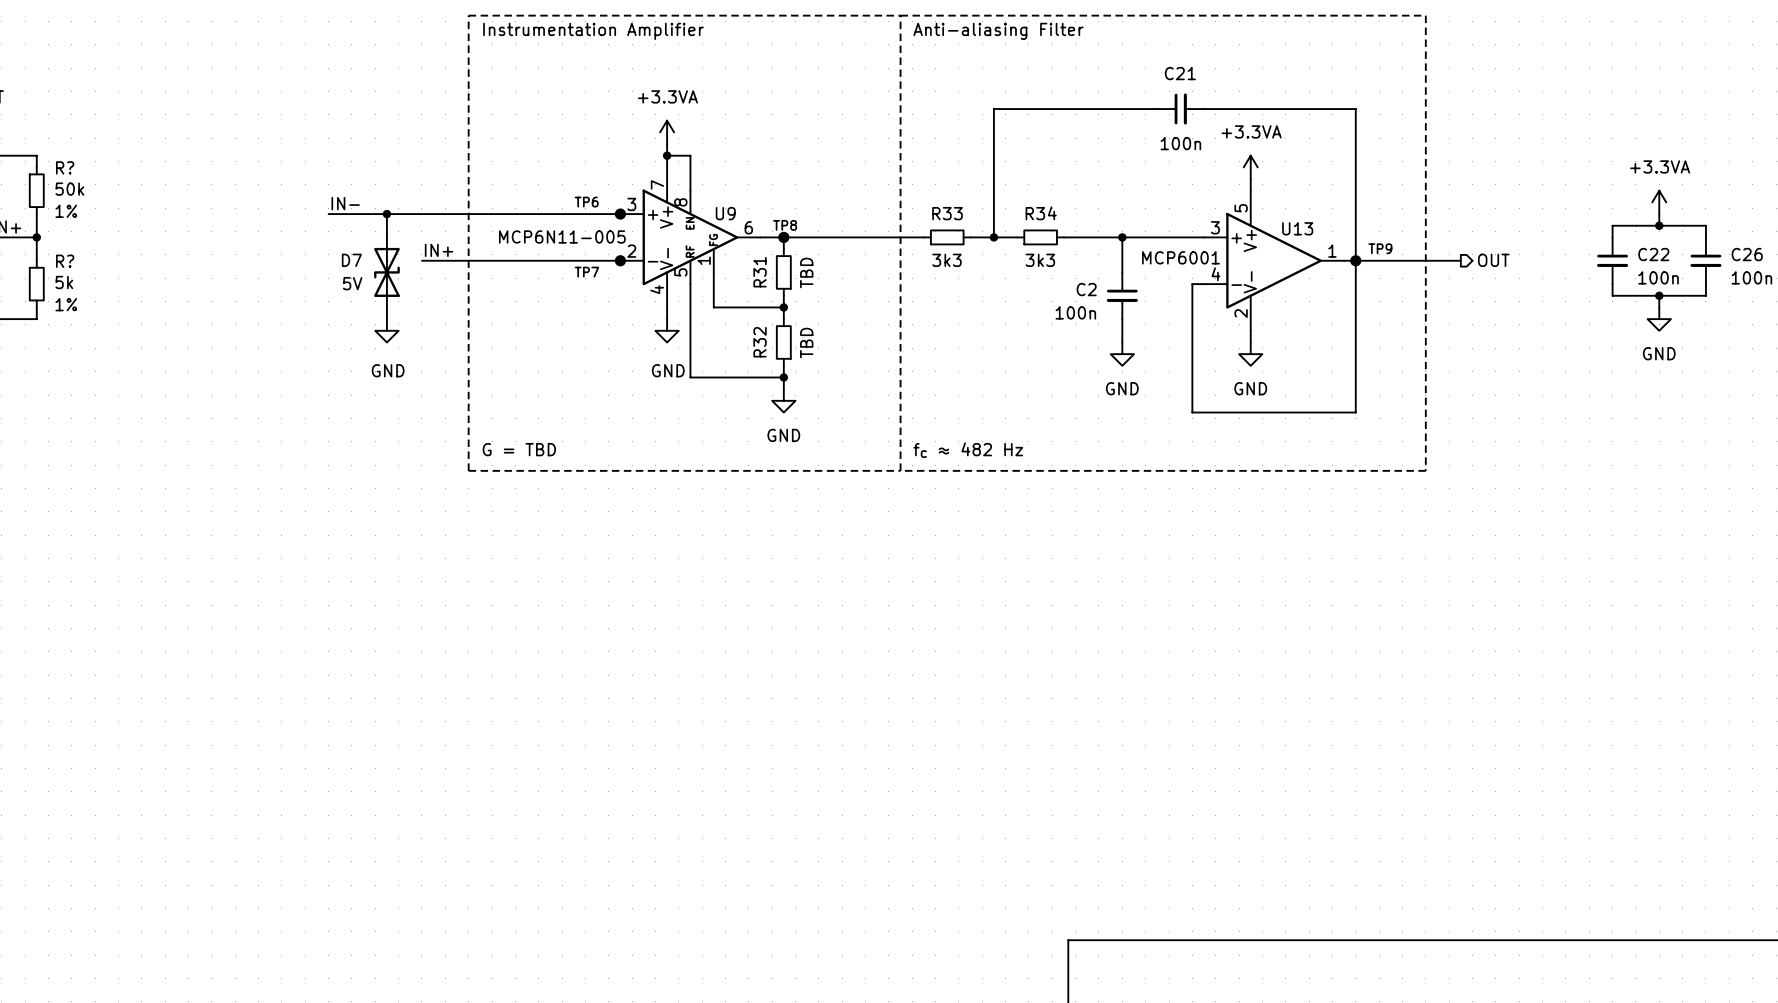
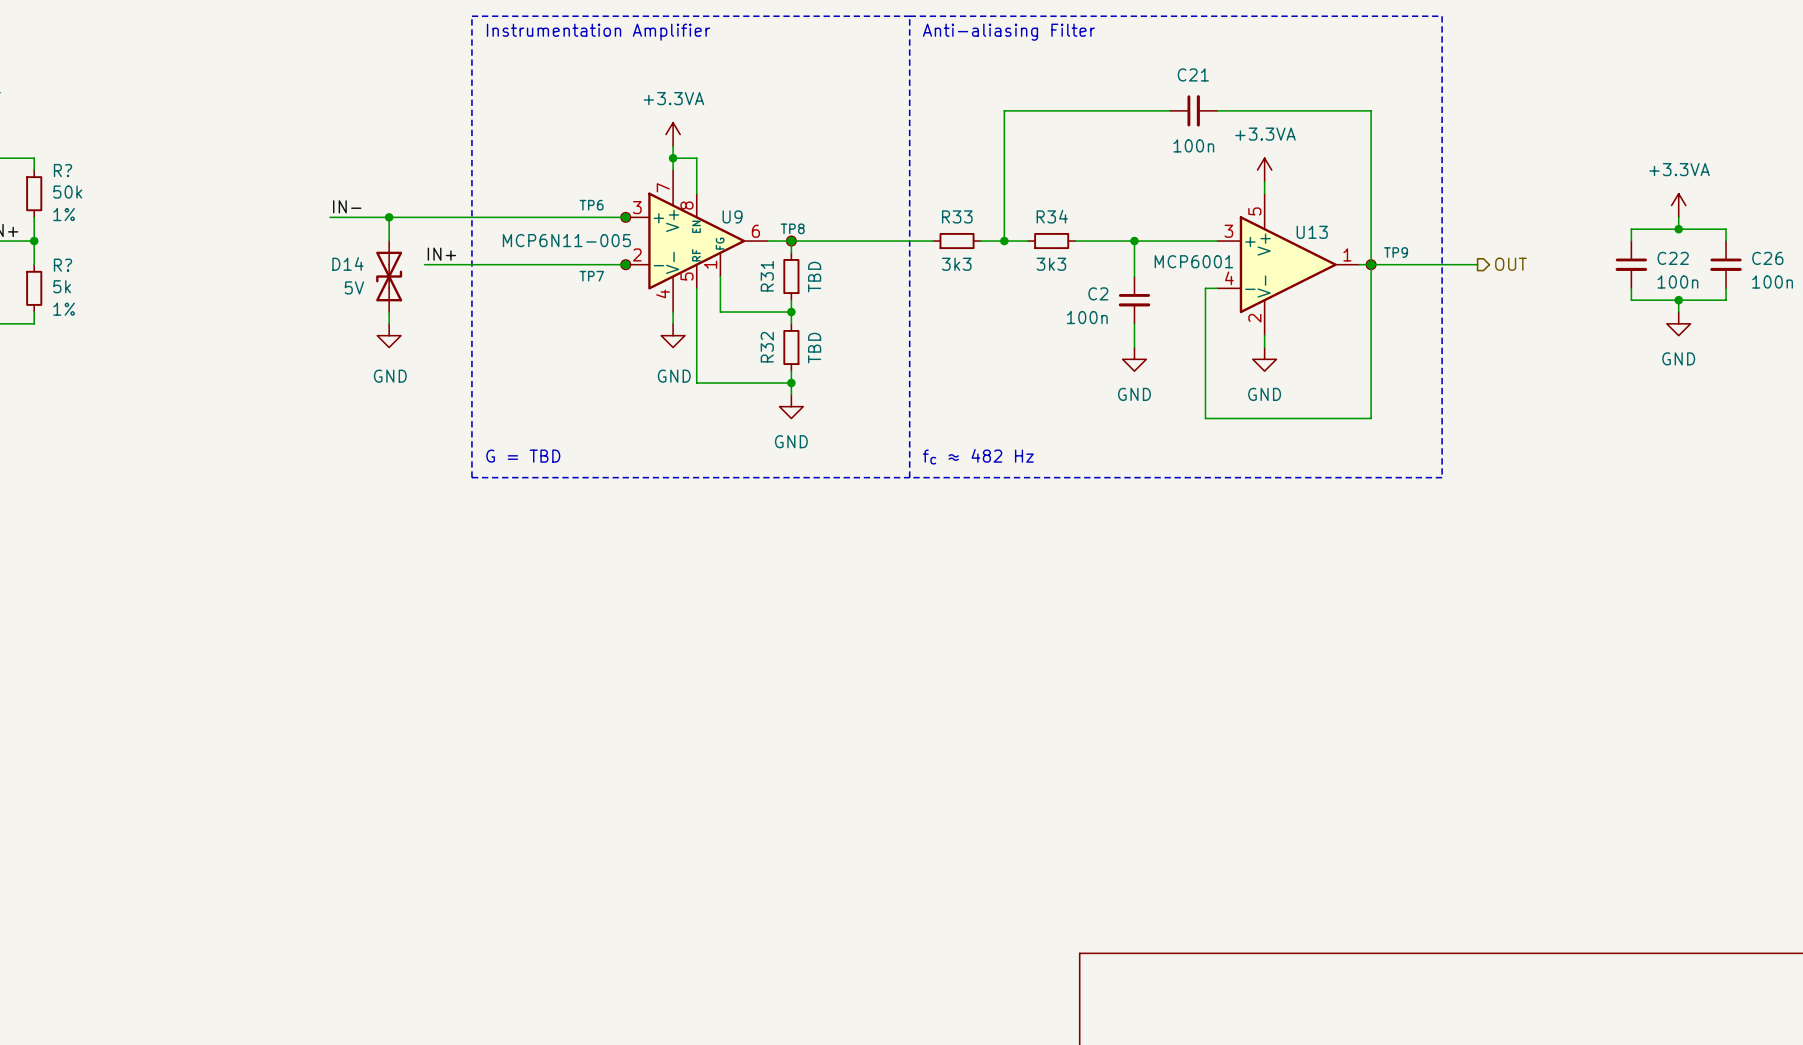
D7 name: D7 (351, 260) -> D14 (347, 263)

